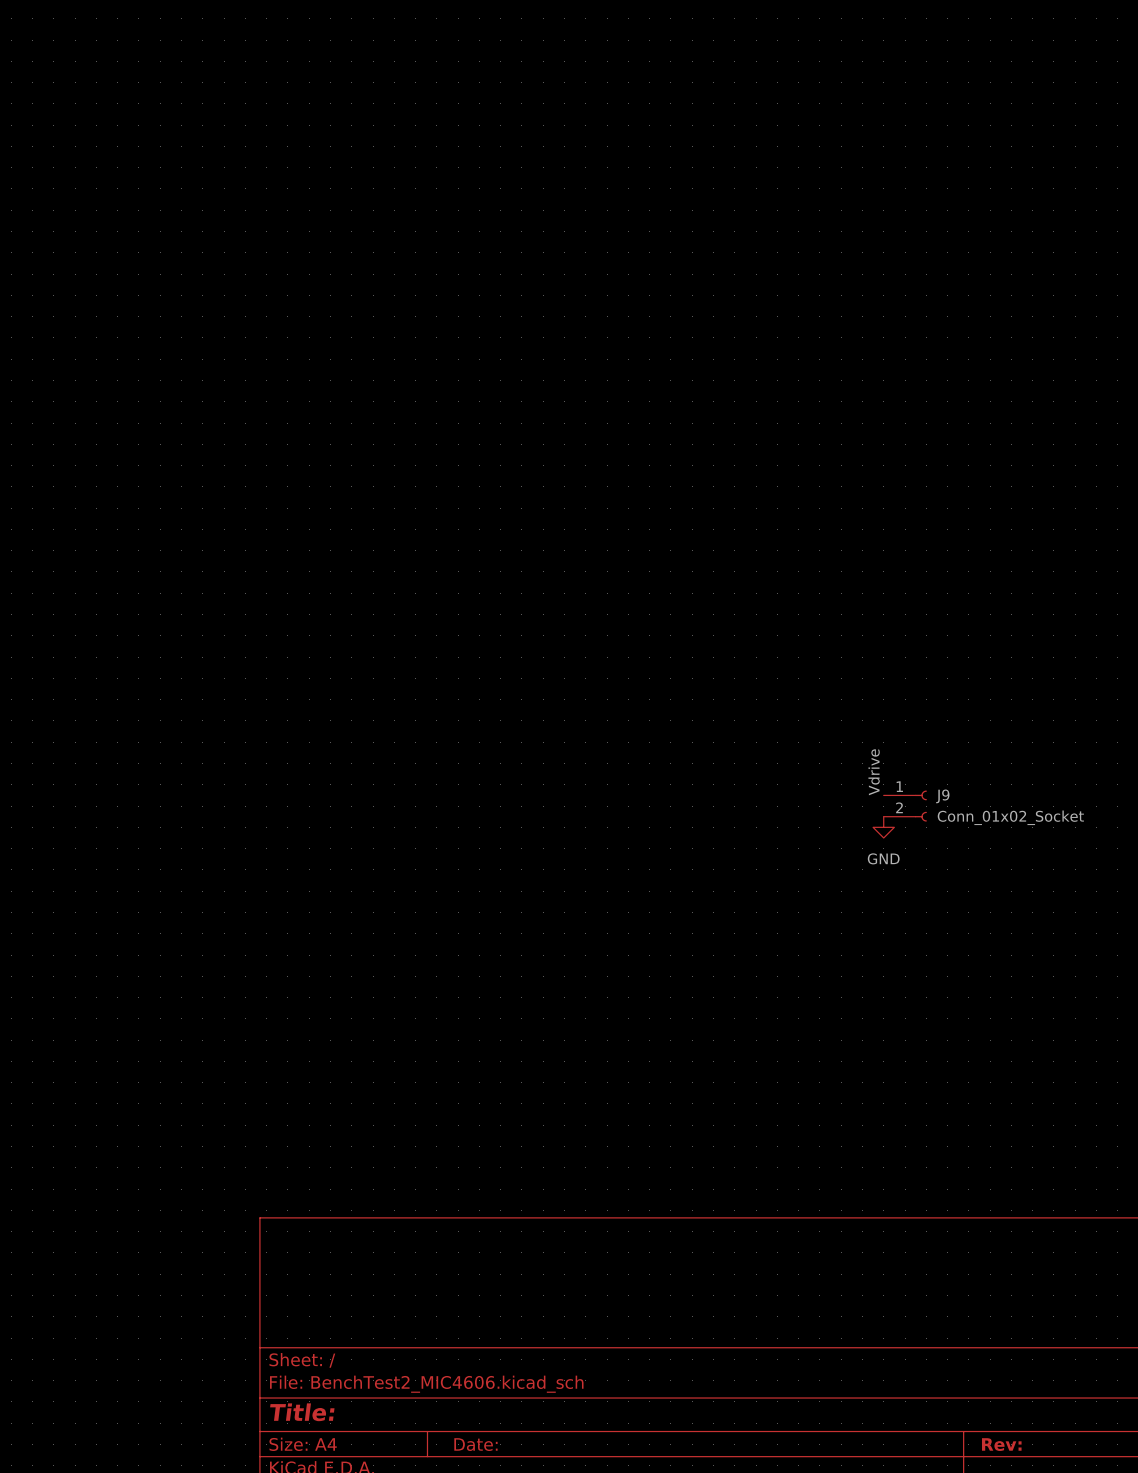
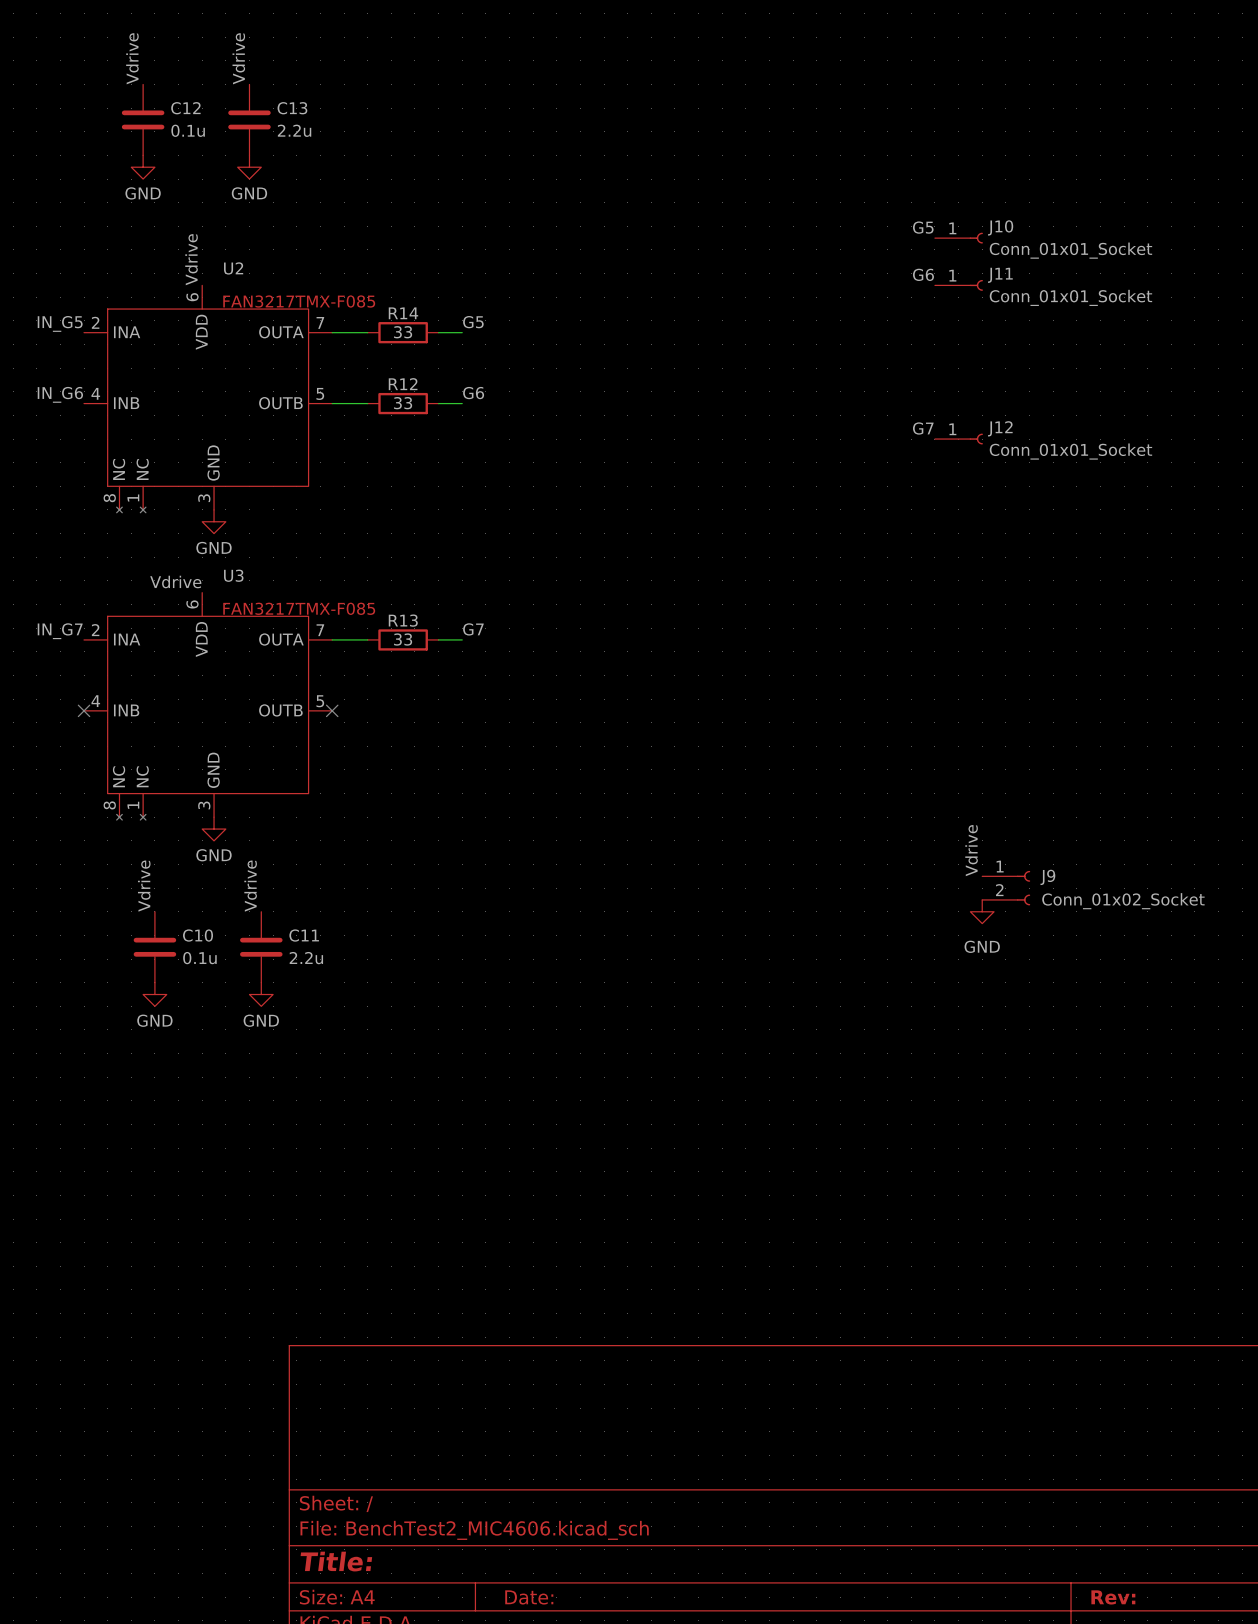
label: none -> Vdrive (132, 58)
label: none -> Vdrive (238, 58)
C12: none -> 0.1u (143, 119)
C13: none -> 2.2u (249, 119)
power symbol: none -> GND (143, 167)
power symbol: none -> GND (249, 167)
label: none -> G5 (923, 227)
J10: none -> Conn_01x01_Socket (958, 238)
label: none -> Vdrive (191, 259)
label: none -> G6 (923, 274)
J11: none -> Conn_01x01_Socket (958, 285)
label: none -> G5 (473, 322)
label: none -> IN_G5 (60, 323)
wire: none -> (332, 332) (367, 332)
R14: none -> 33 (403, 332)
wire: none -> (438, 332) (462, 332)
label: none -> G6 (473, 393)
label: none -> IN_G6 (60, 394)
U2: none -> (208, 399)
wire: none -> (332, 403) (367, 403)
R12: none -> 33 (403, 403)
wire: none -> (438, 403) (462, 403)
label: none -> G7 (923, 428)
J12: none -> Conn_01x01_Socket (958, 439)
power symbol: none -> GND (214, 521)
label: none -> Vdrive (175, 582)
label: none -> G7 (473, 629)
label: none -> IN_G7 (60, 631)
wire: none -> (332, 639) (367, 639)
R13: none -> 33 (403, 639)
wire: none -> (438, 639) (462, 639)
U3: none -> (208, 706)
no-connect mark: none -> (84, 710)
no-connect mark: none -> (332, 710)
power symbol: none -> GND (214, 829)
label: none -> Vdrive (144, 886)
label: none -> Vdrive (250, 886)
C10: none -> 0.1u (154, 947)
C11: none -> 2.2u (261, 947)
power symbol: none -> GND (154, 994)
power symbol: none -> GND (261, 994)

